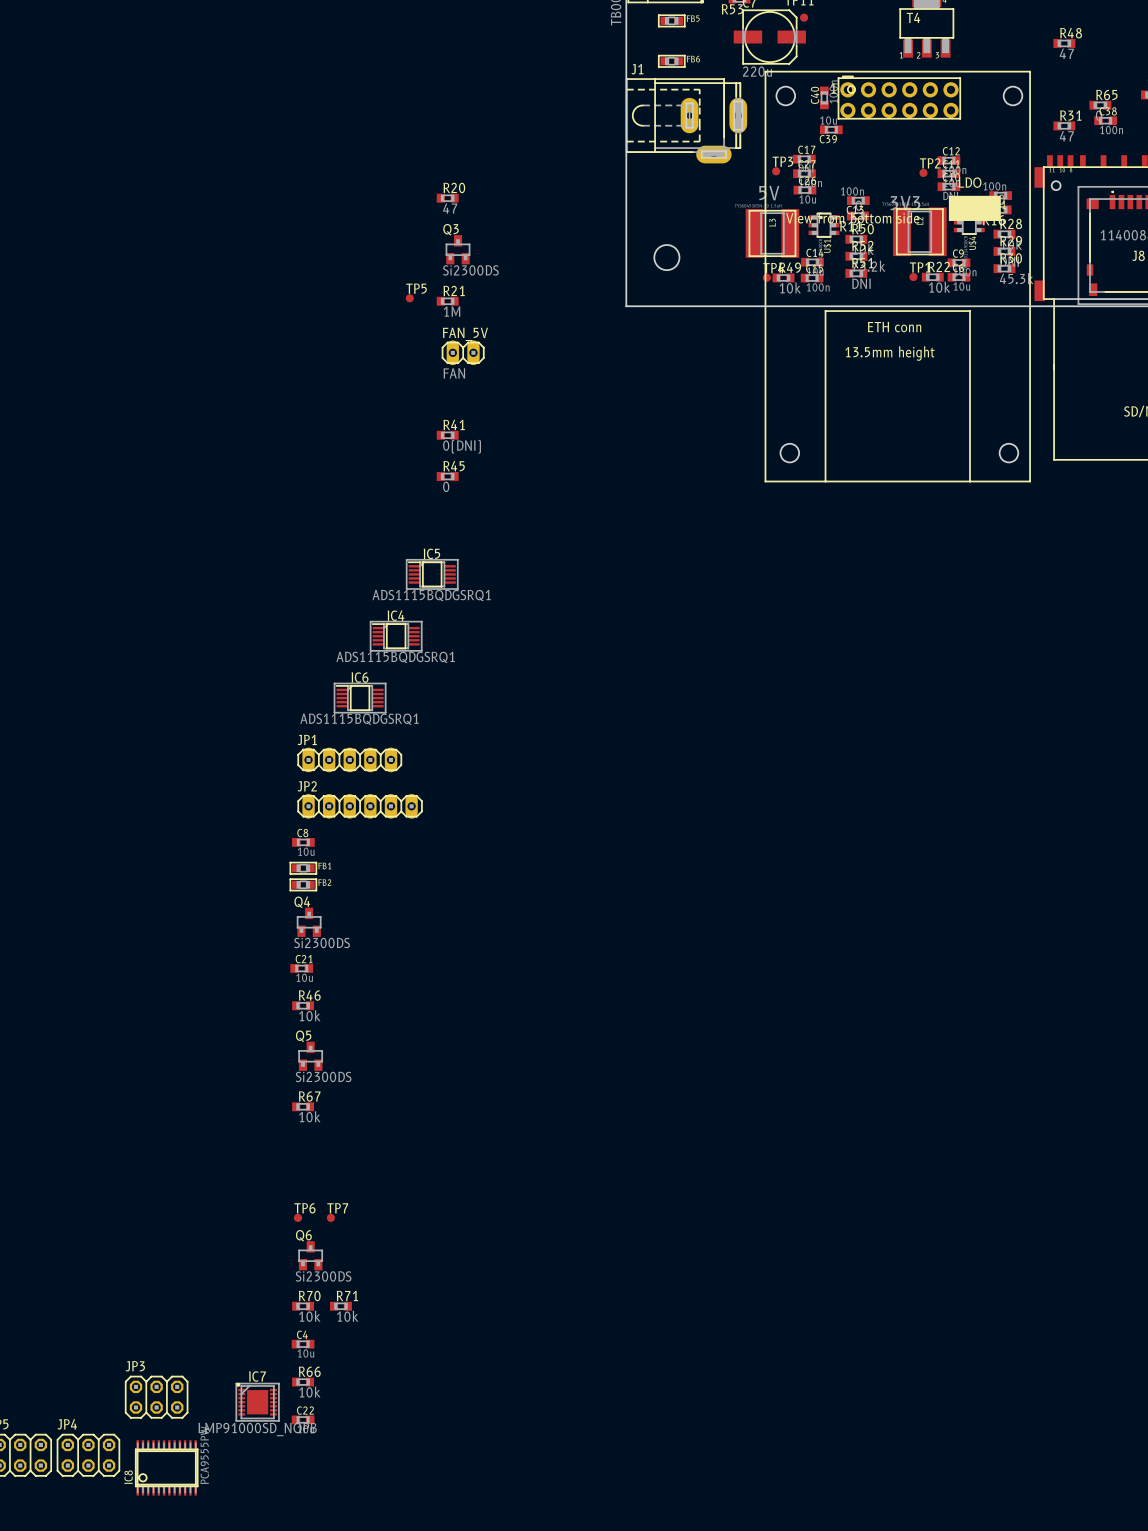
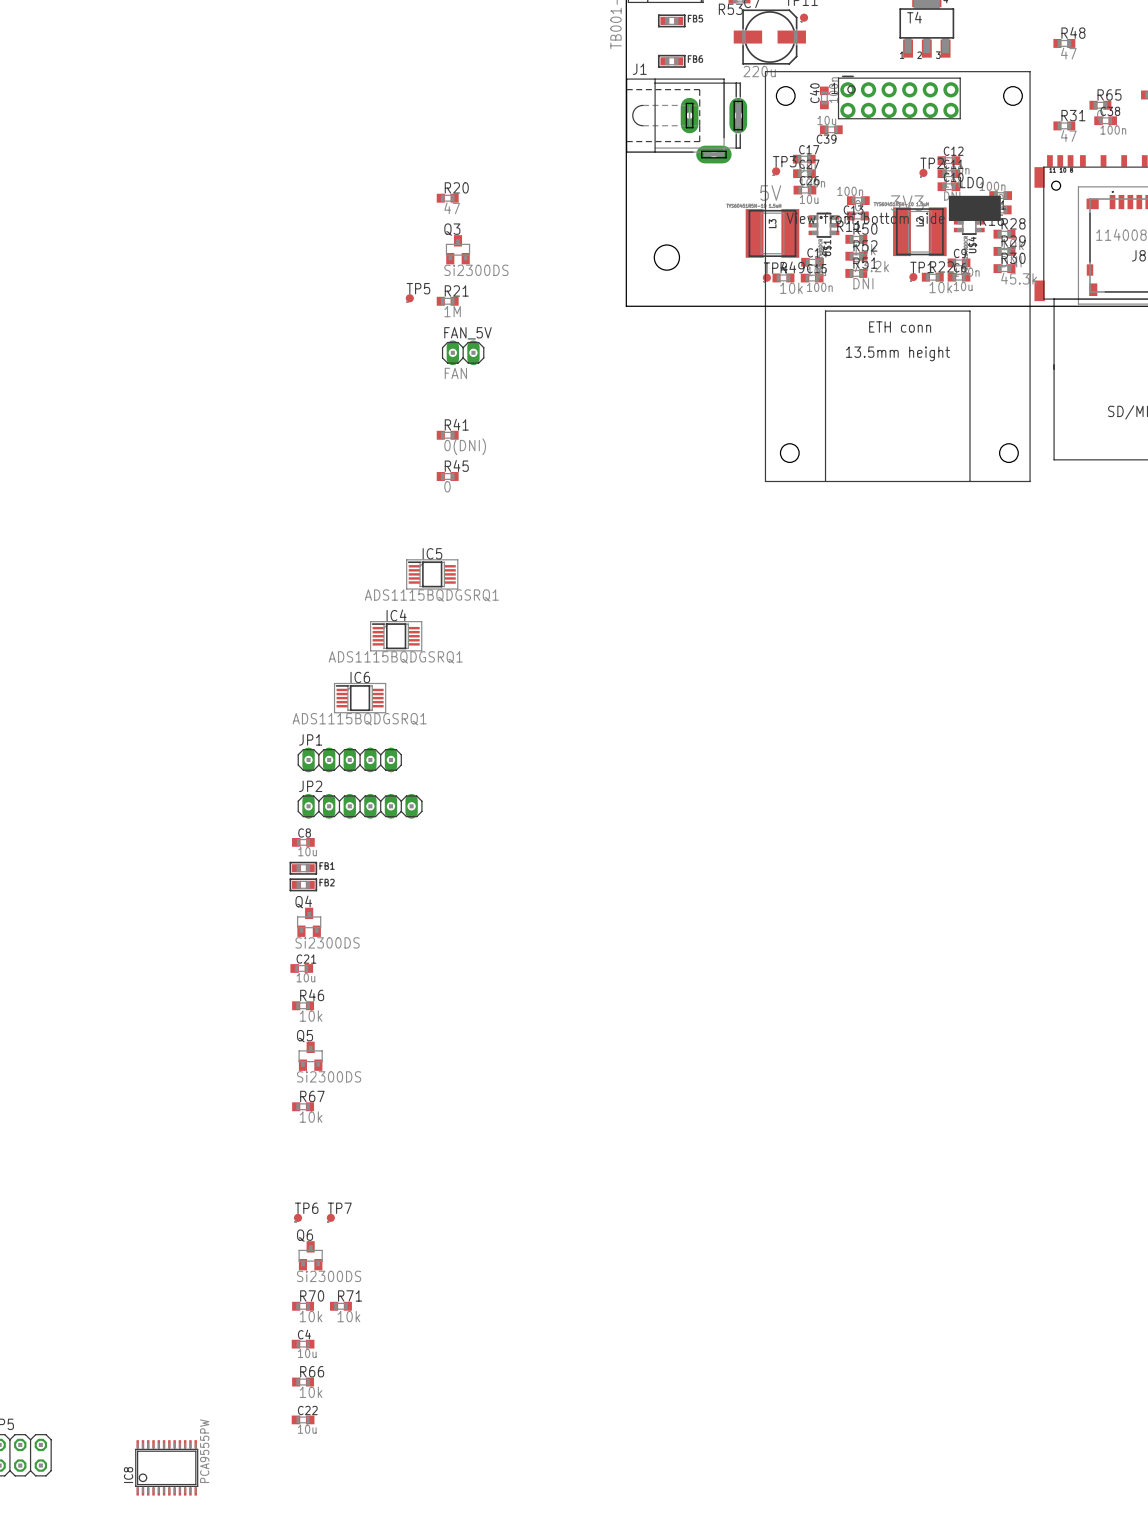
JP3: (156, 1397) -> none
IC7: LMP91000SD_NOPB (257, 1401) -> none
JP4: (88, 1455) -> none

